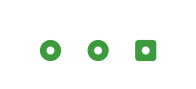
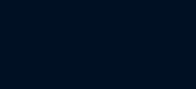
part: (98, 50) -> none

